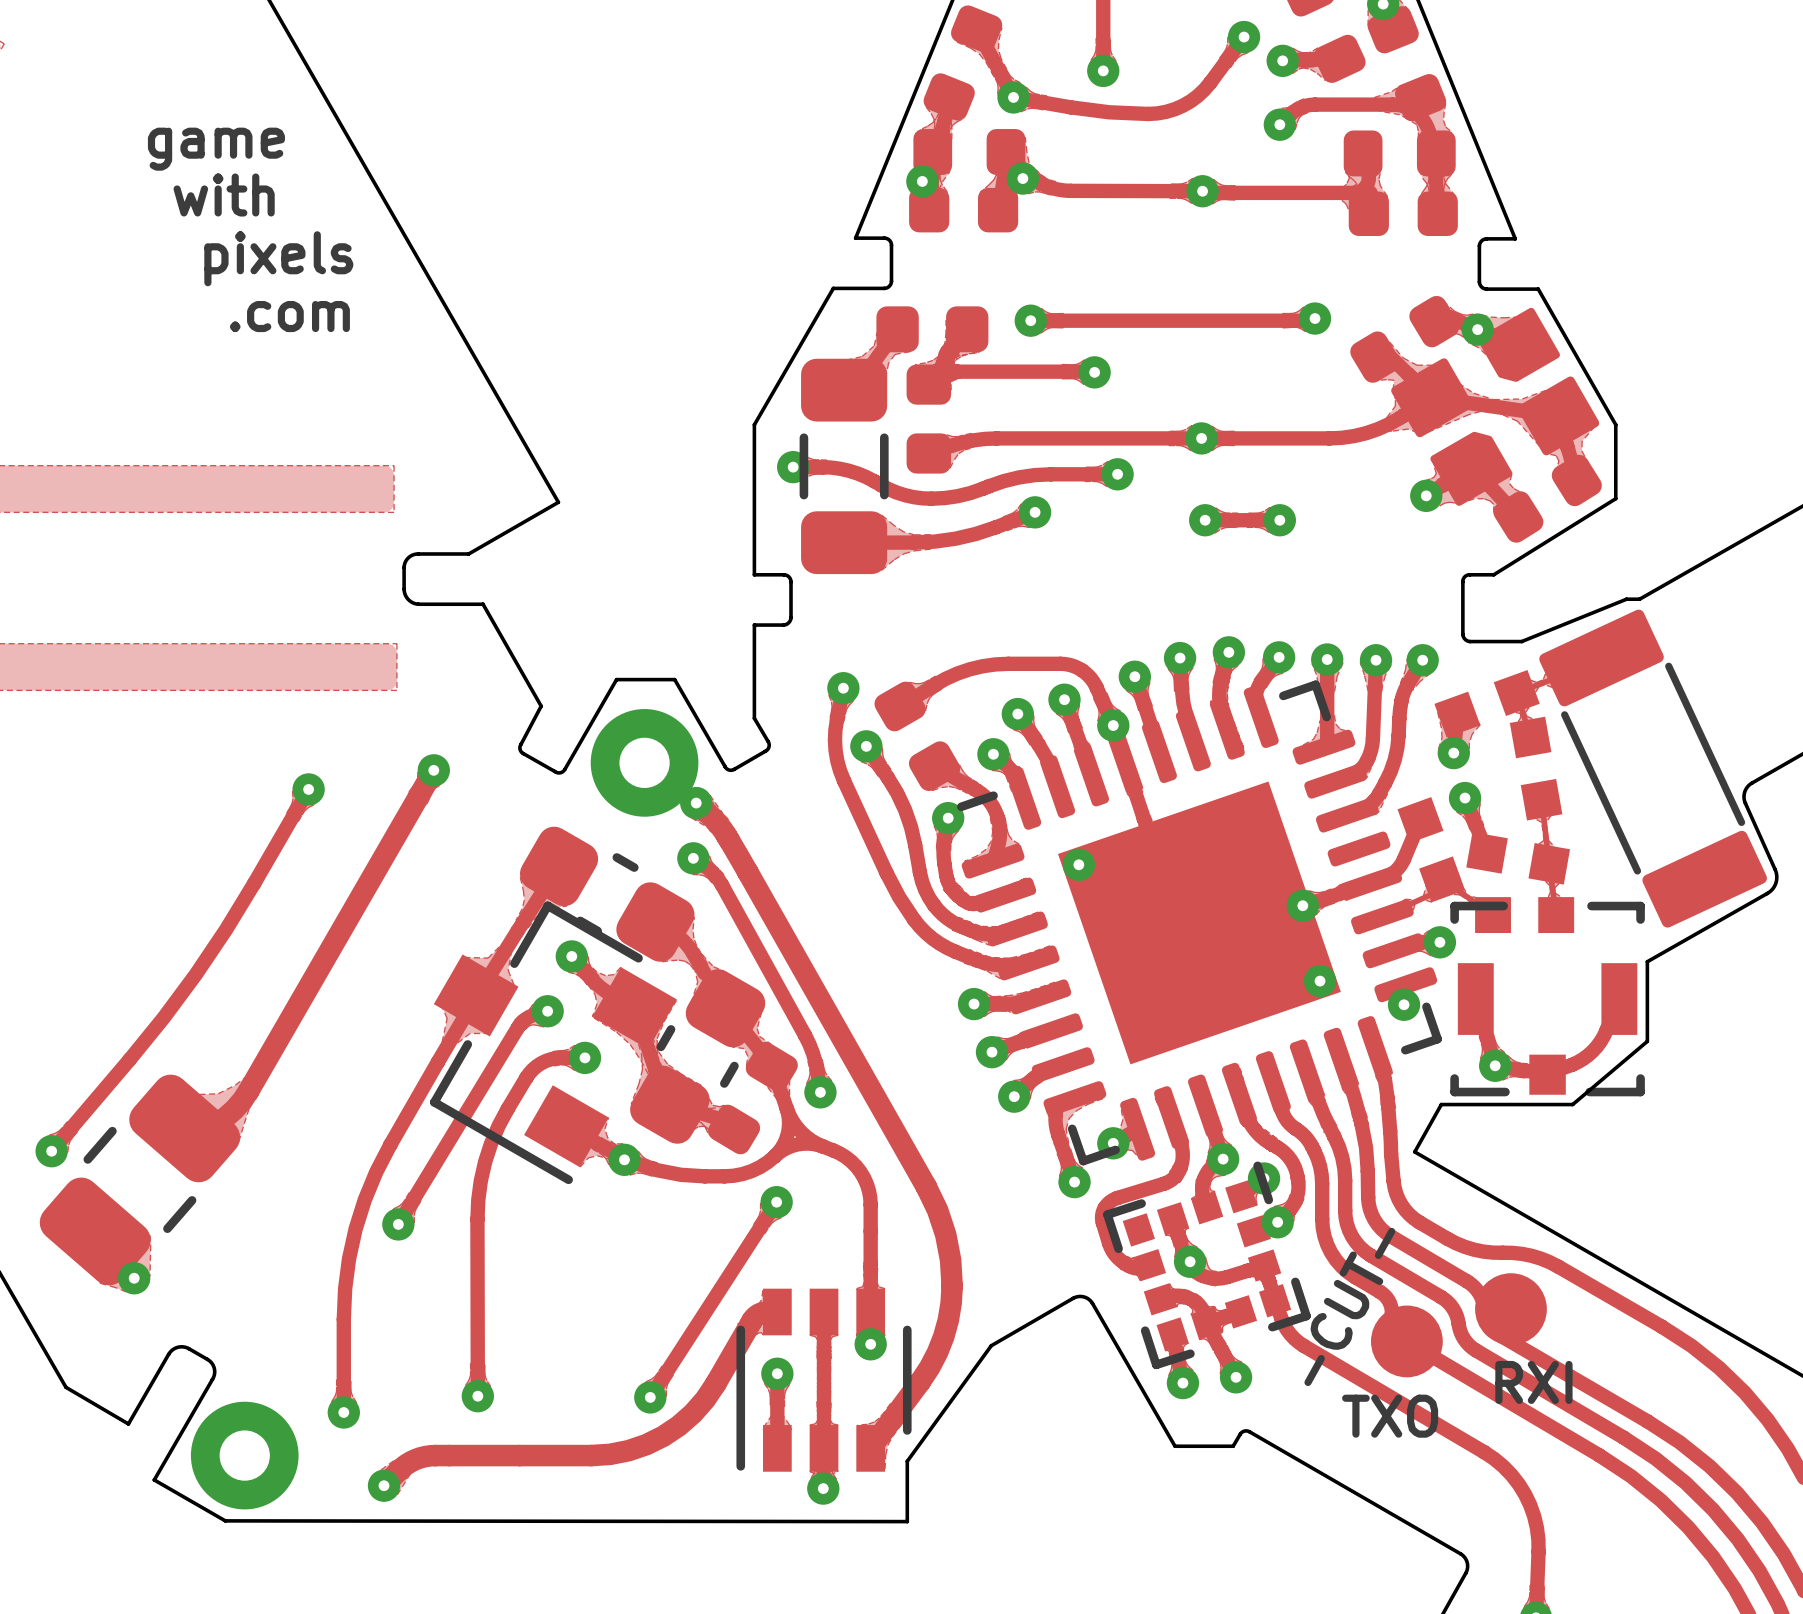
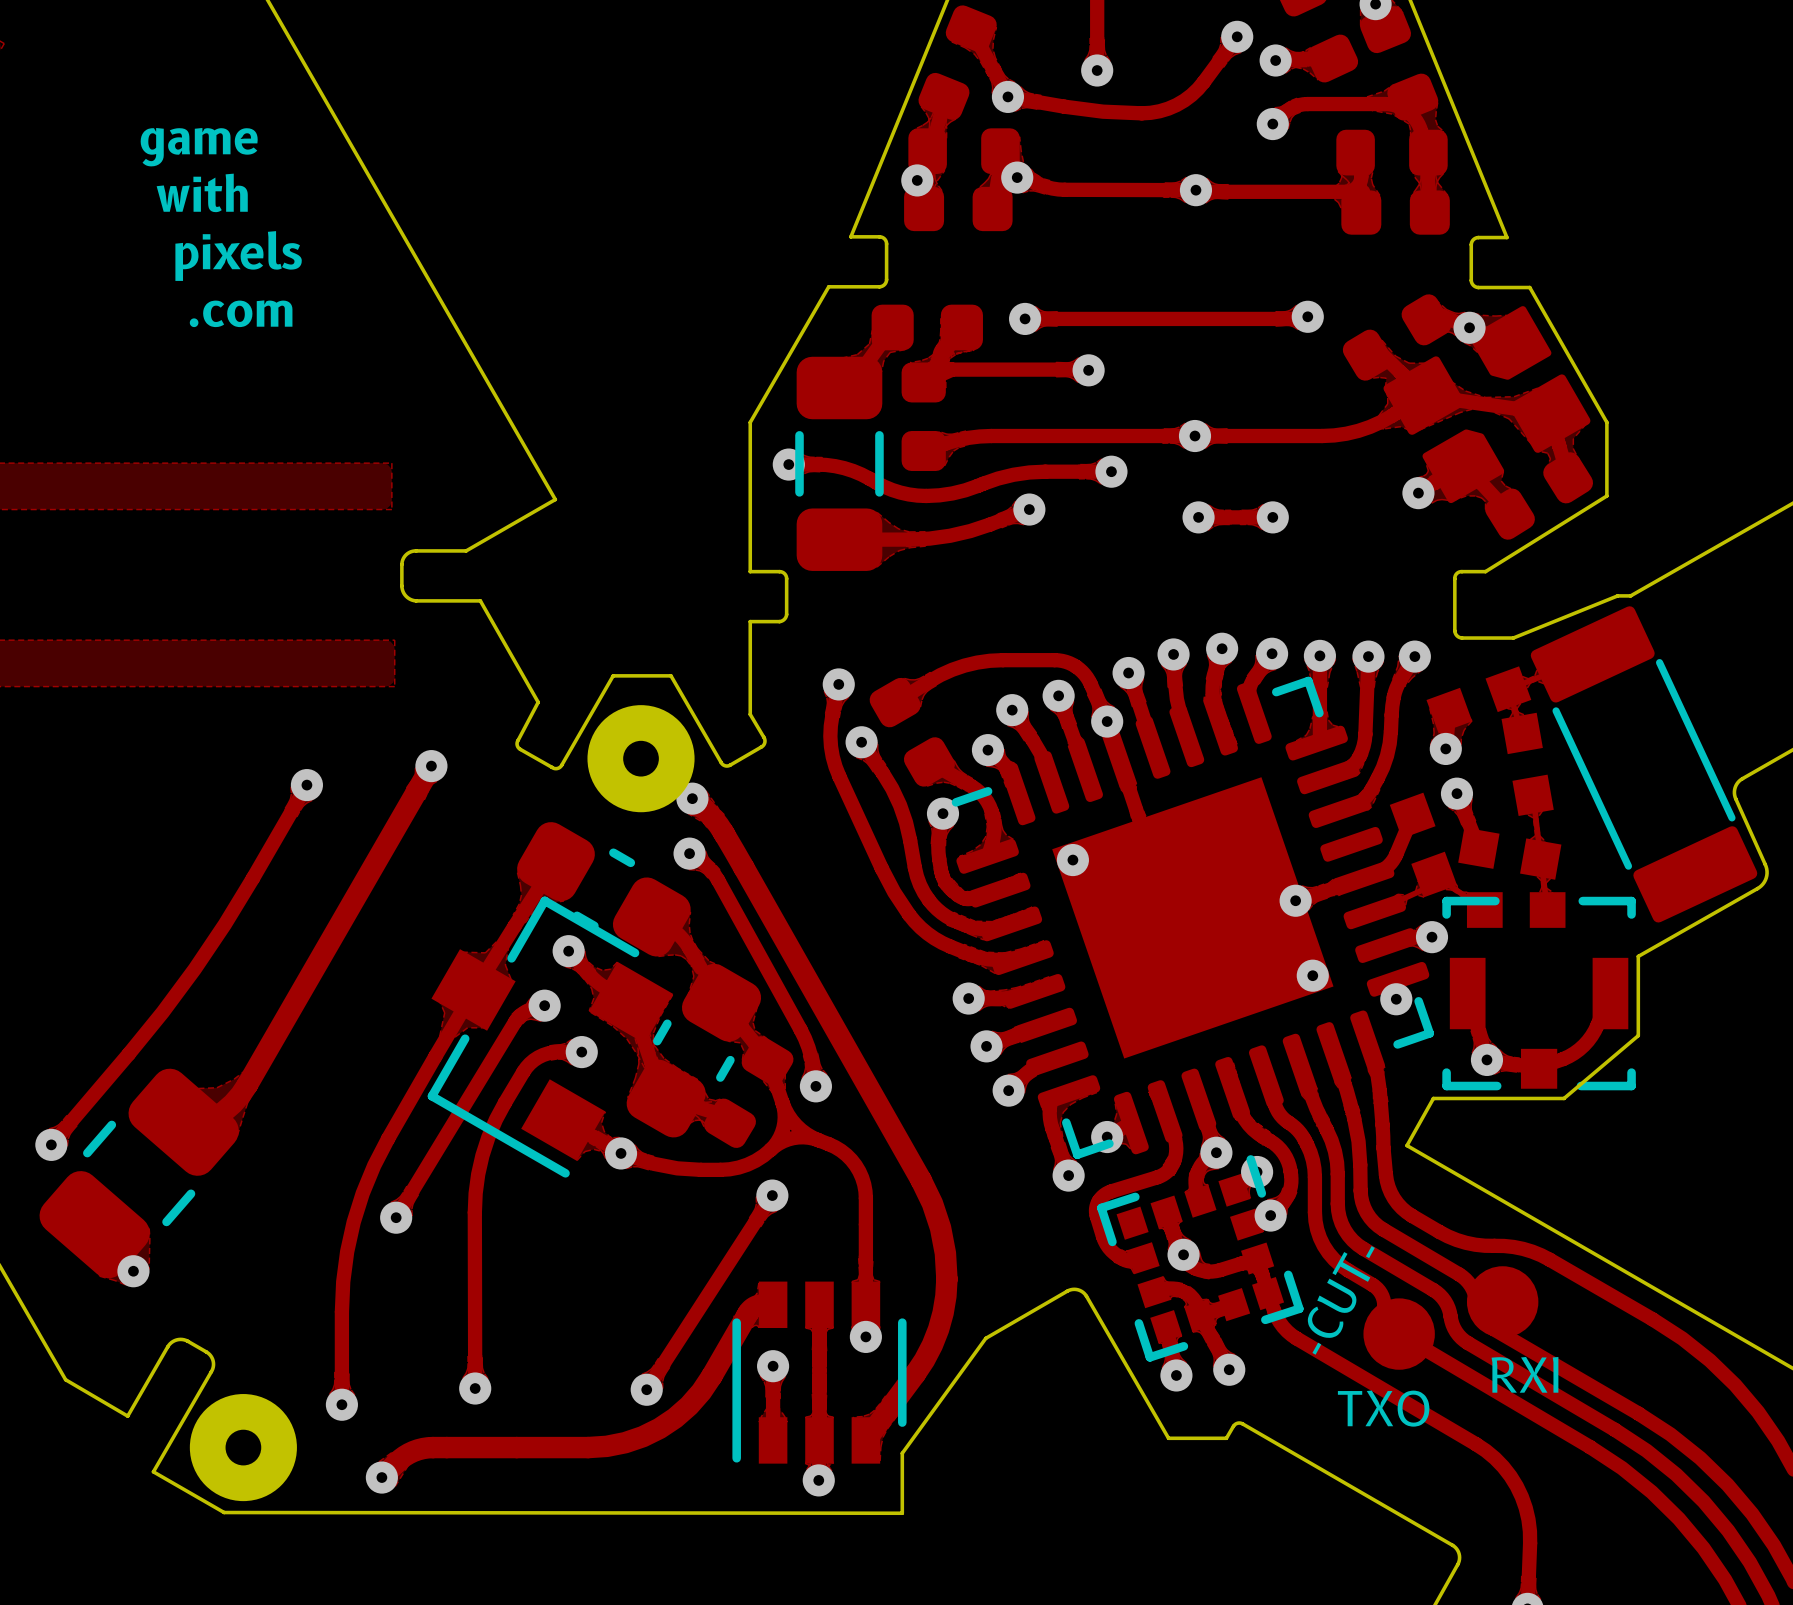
part footprint: [590, 709, 699, 817] -> [587, 705, 695, 813]
part footprint: [190, 1401, 299, 1510] -> [189, 1394, 297, 1502]

